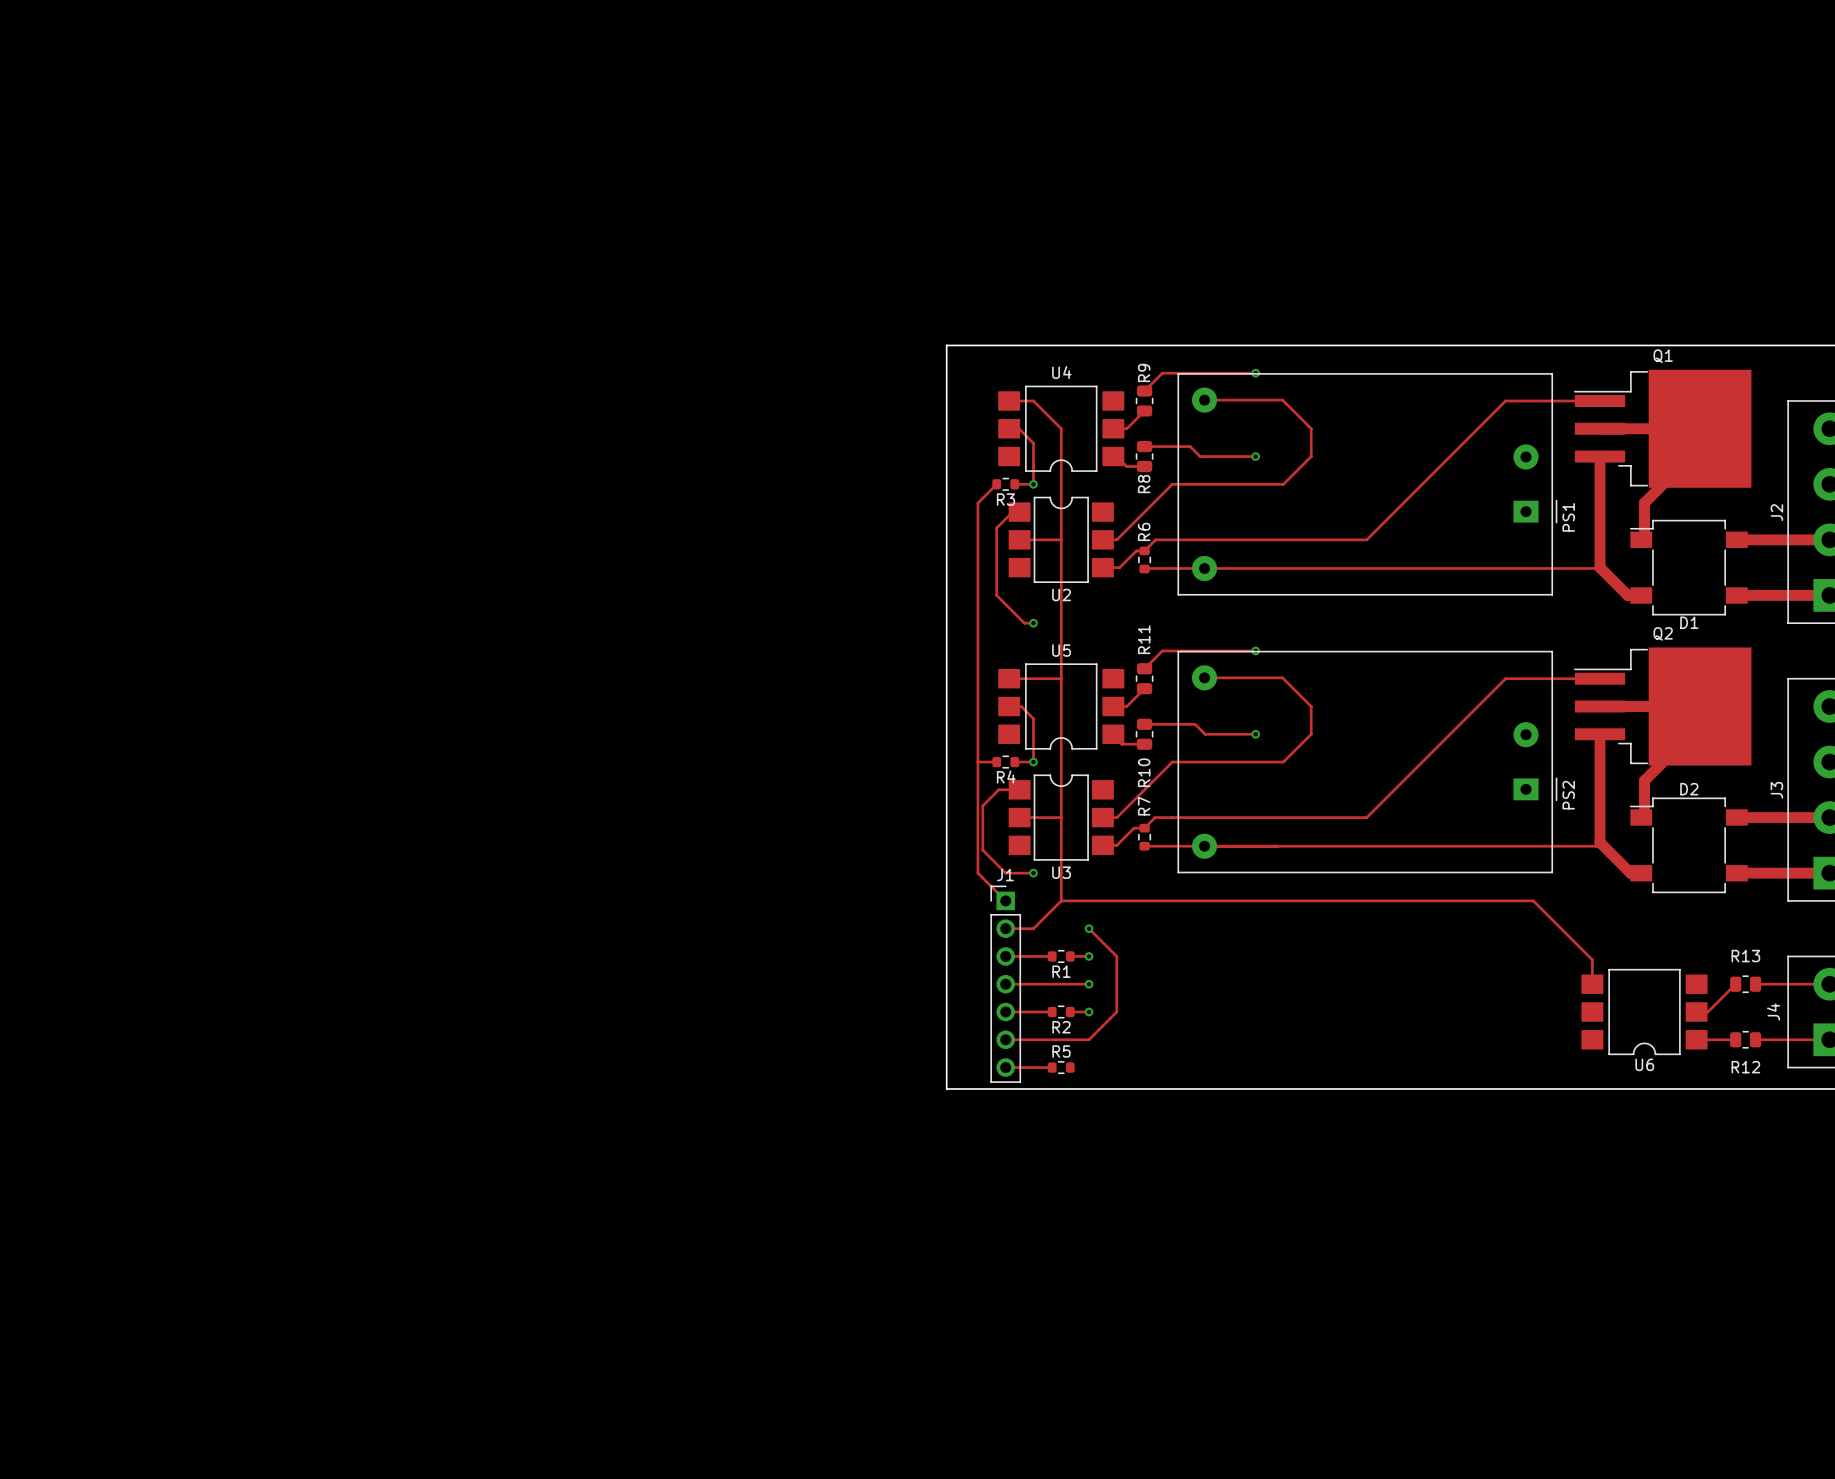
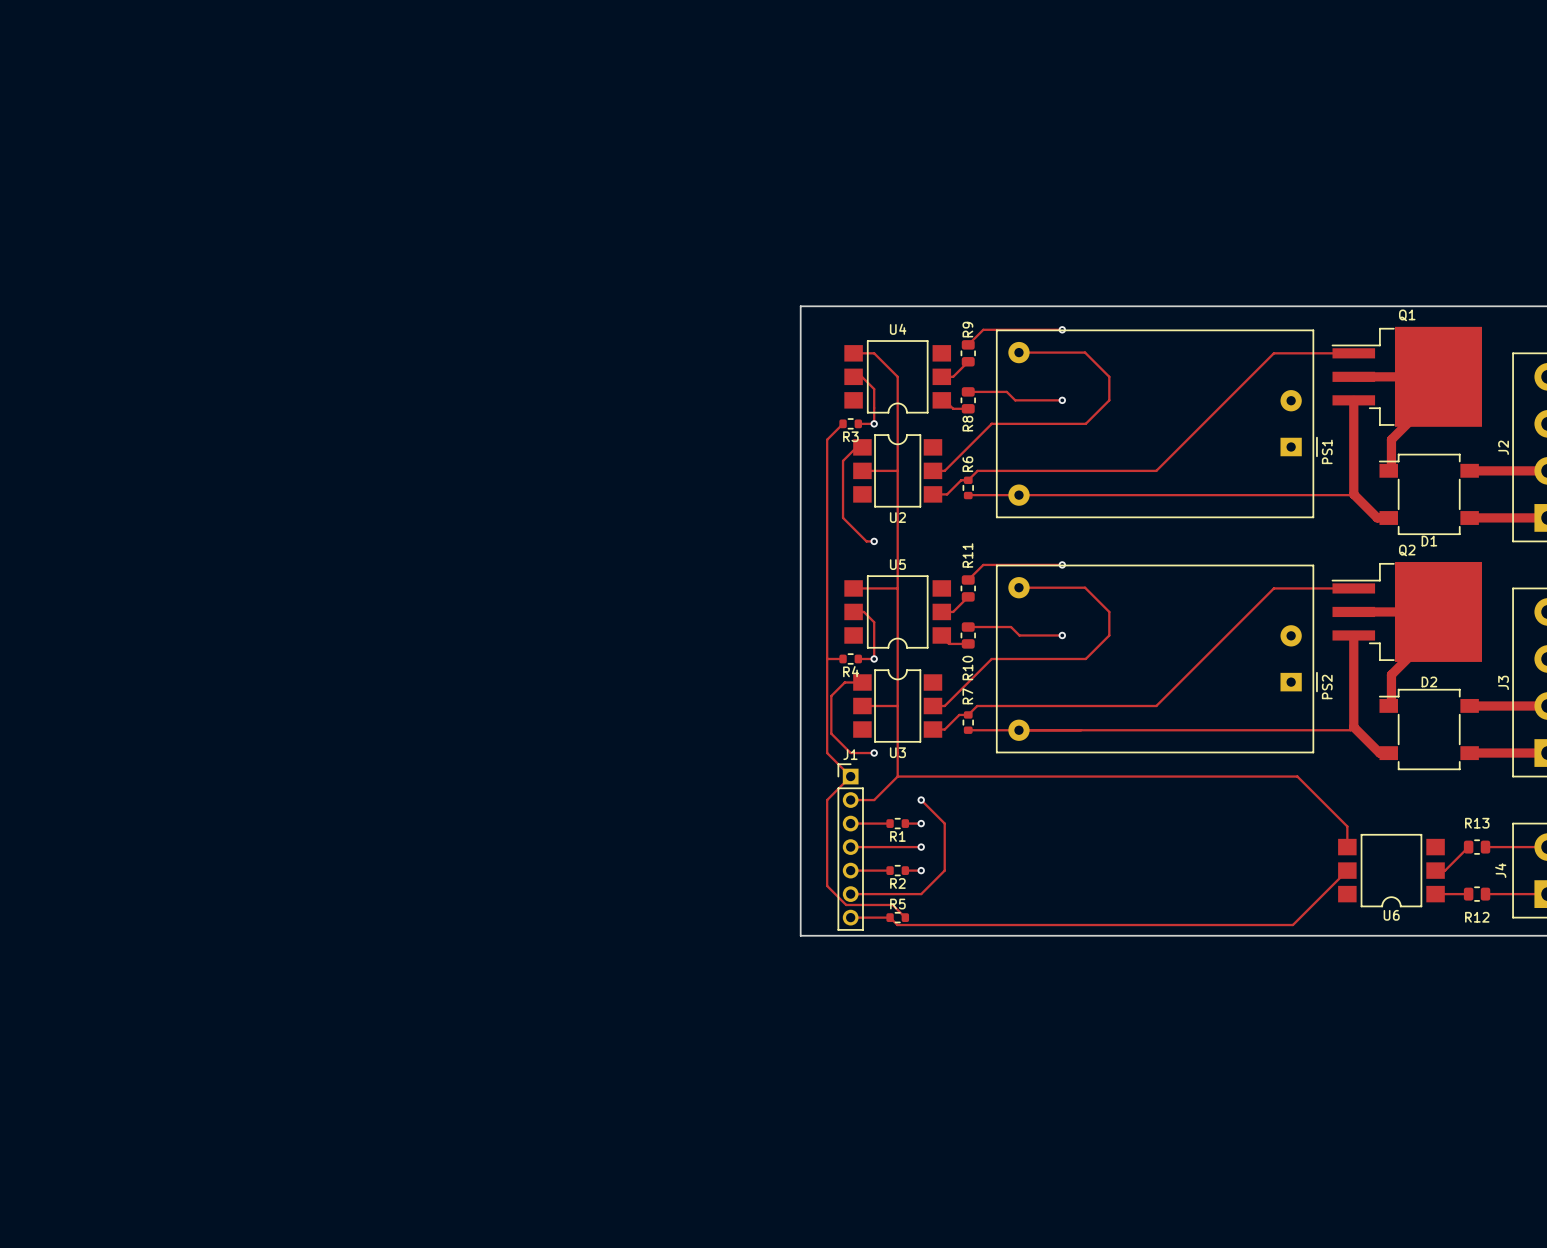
track: none -> (850, 776) (827, 800) (827, 885) (846, 904) (892, 904) (905, 917)
track: none -> (1347, 870) (1292, 925) (897, 925) (890, 917)

